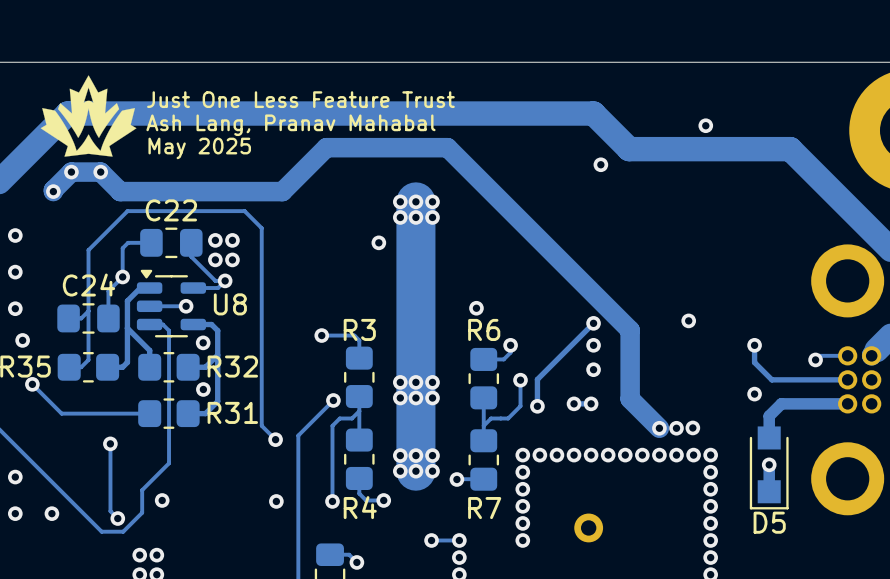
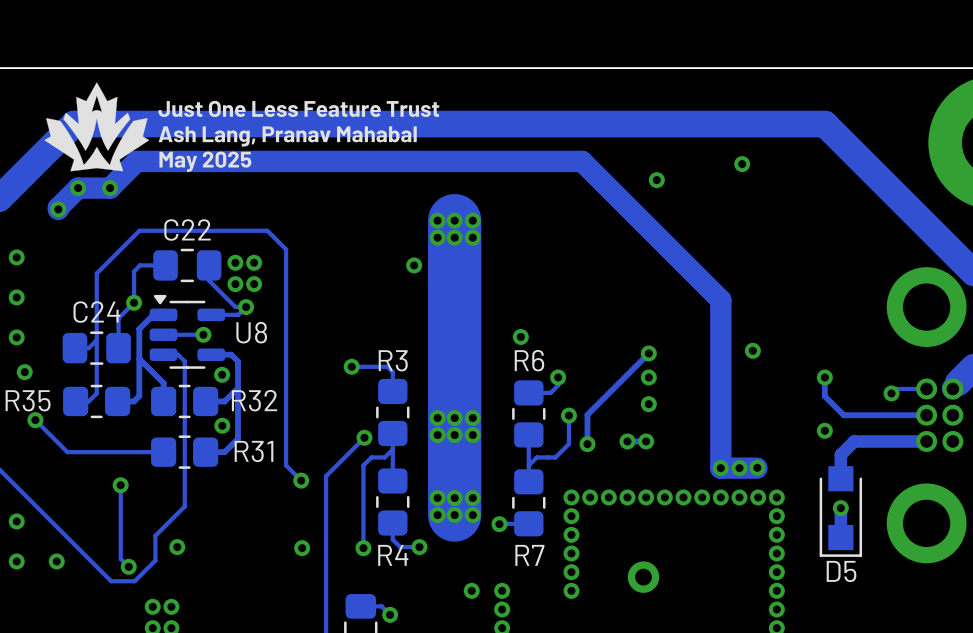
track: (593, 113) (629, 149) (790, 149) -> (648, 124) (824, 124) (863, 163)
via position: (705, 125) -> (742, 164)
track: (326, 147) (282, 191) (120, 191) (100, 172) -> (356, 161) (136, 161) (110, 188)
track: (447, 147) (630, 330) (630, 398) (659, 428) -> (489, 161) (582, 161) (720, 300) (720, 468) (757, 468)
track width: thin (415, 201) (415, 471) -> thick (454, 220) (454, 515)
track: (459, 540) (431, 540) -> none

